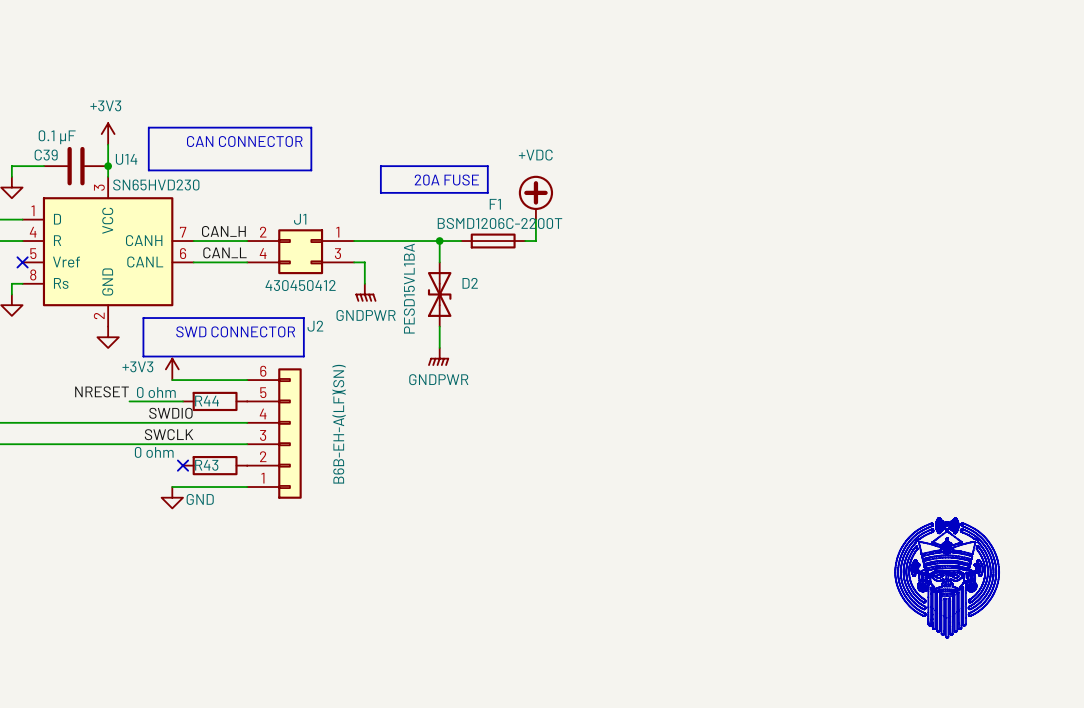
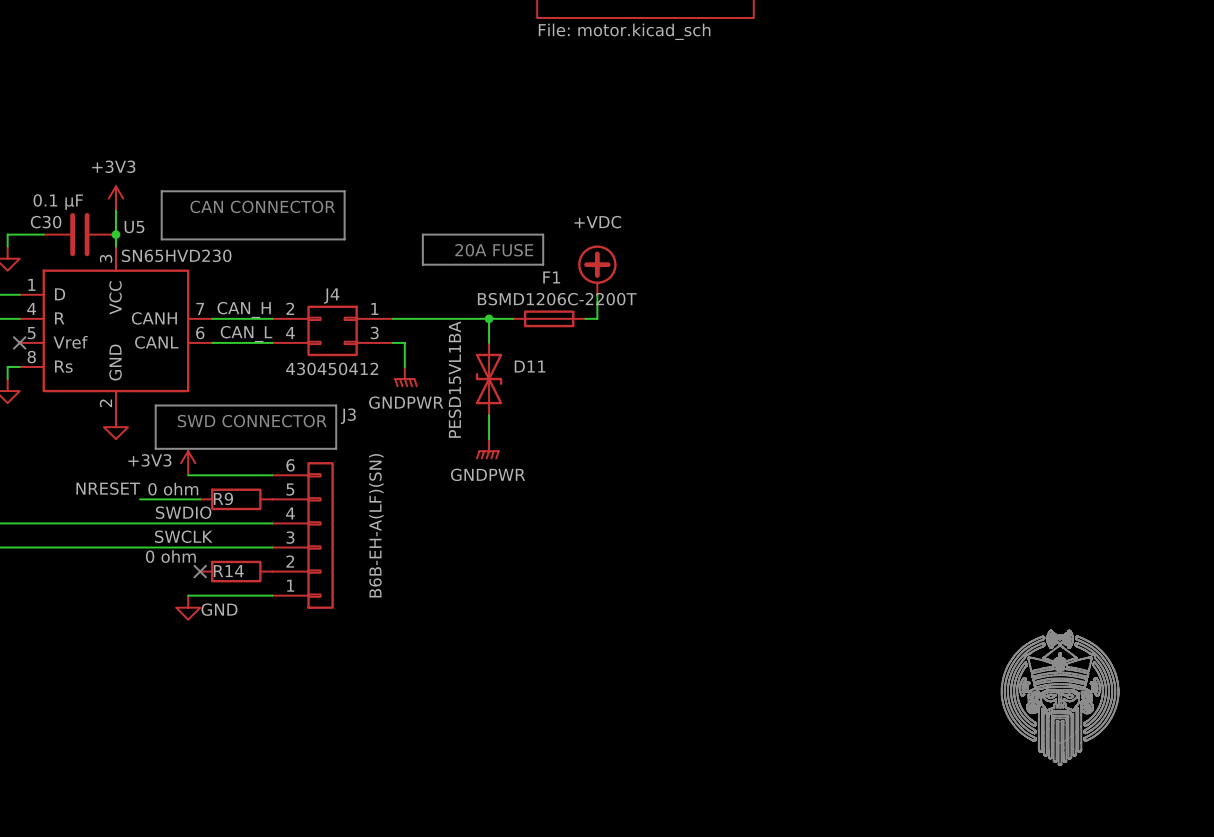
C39 name: C39 (46, 155) -> C30 (46, 222)
U14 name: U14 (126, 159) -> U5 (134, 227)
J1 name: J1 (300, 219) -> J4 (331, 295)
D2 name: D2 (470, 283) -> D11 (530, 366)
J2 name: J2 (315, 326) -> J3 (348, 416)
R44 name: R44 (207, 401) -> R9 (223, 498)
R43 name: R43 (206, 465) -> R14 (228, 571)

